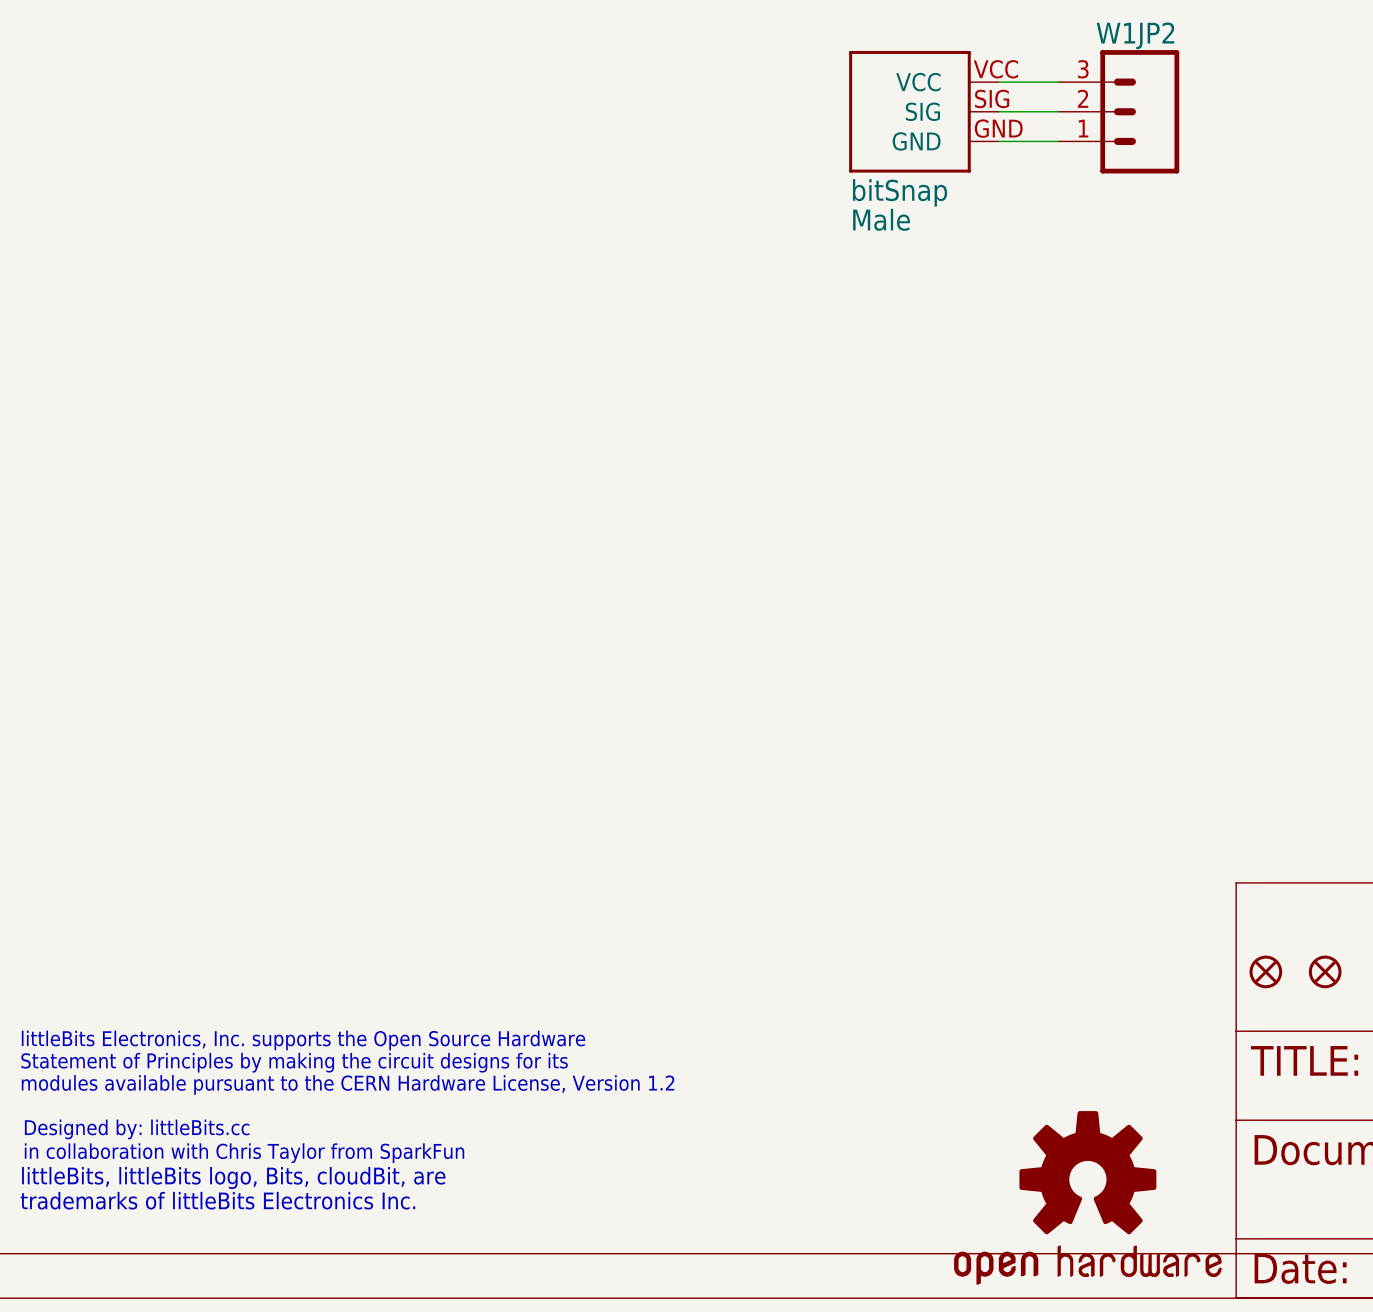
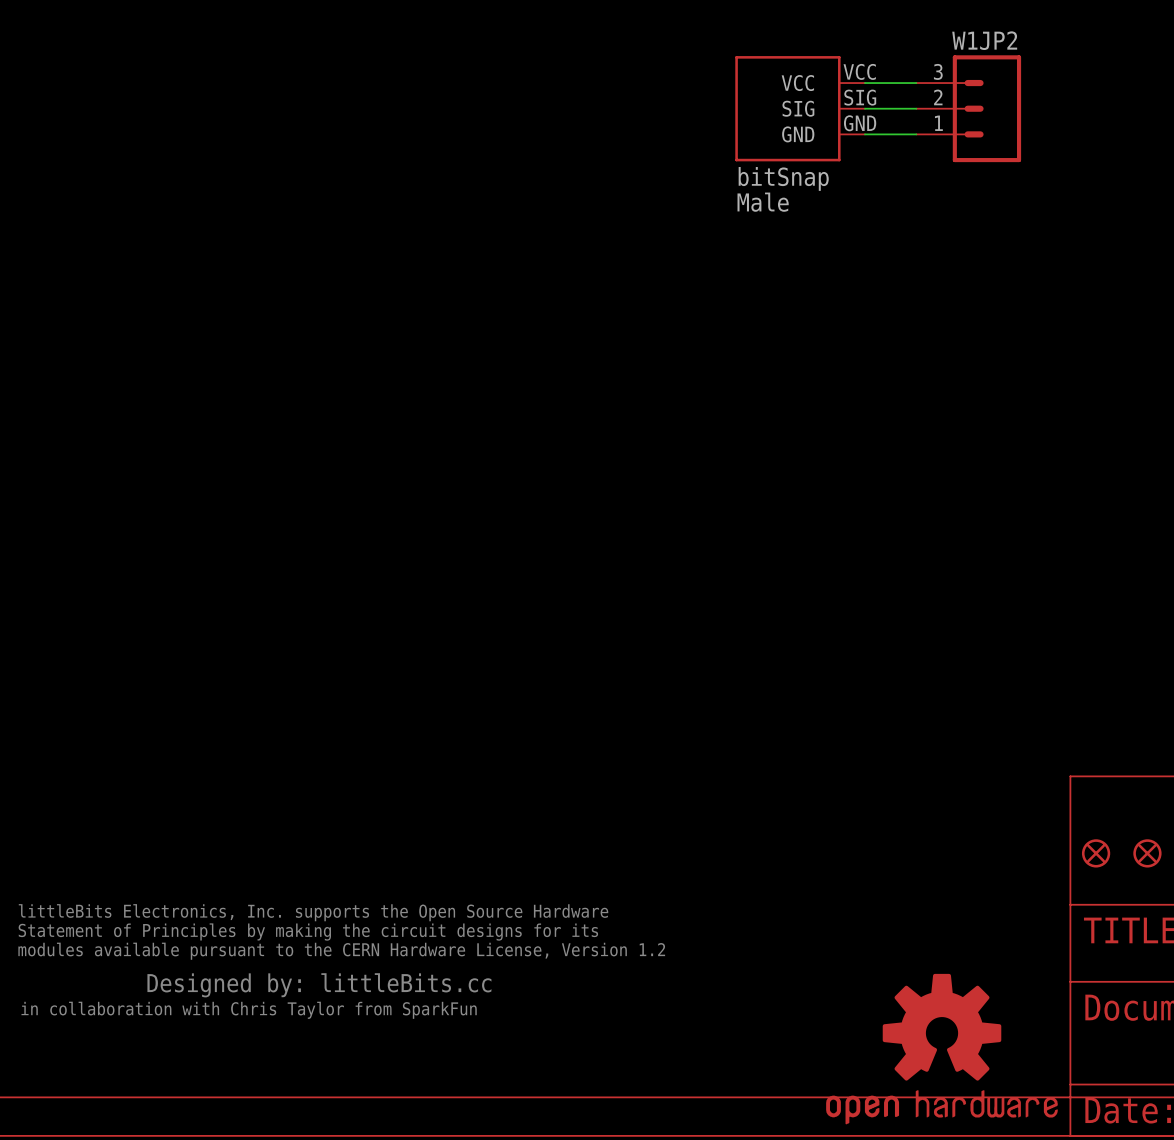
part: none -> (341, 950)
part: (347, 1120) -> none

